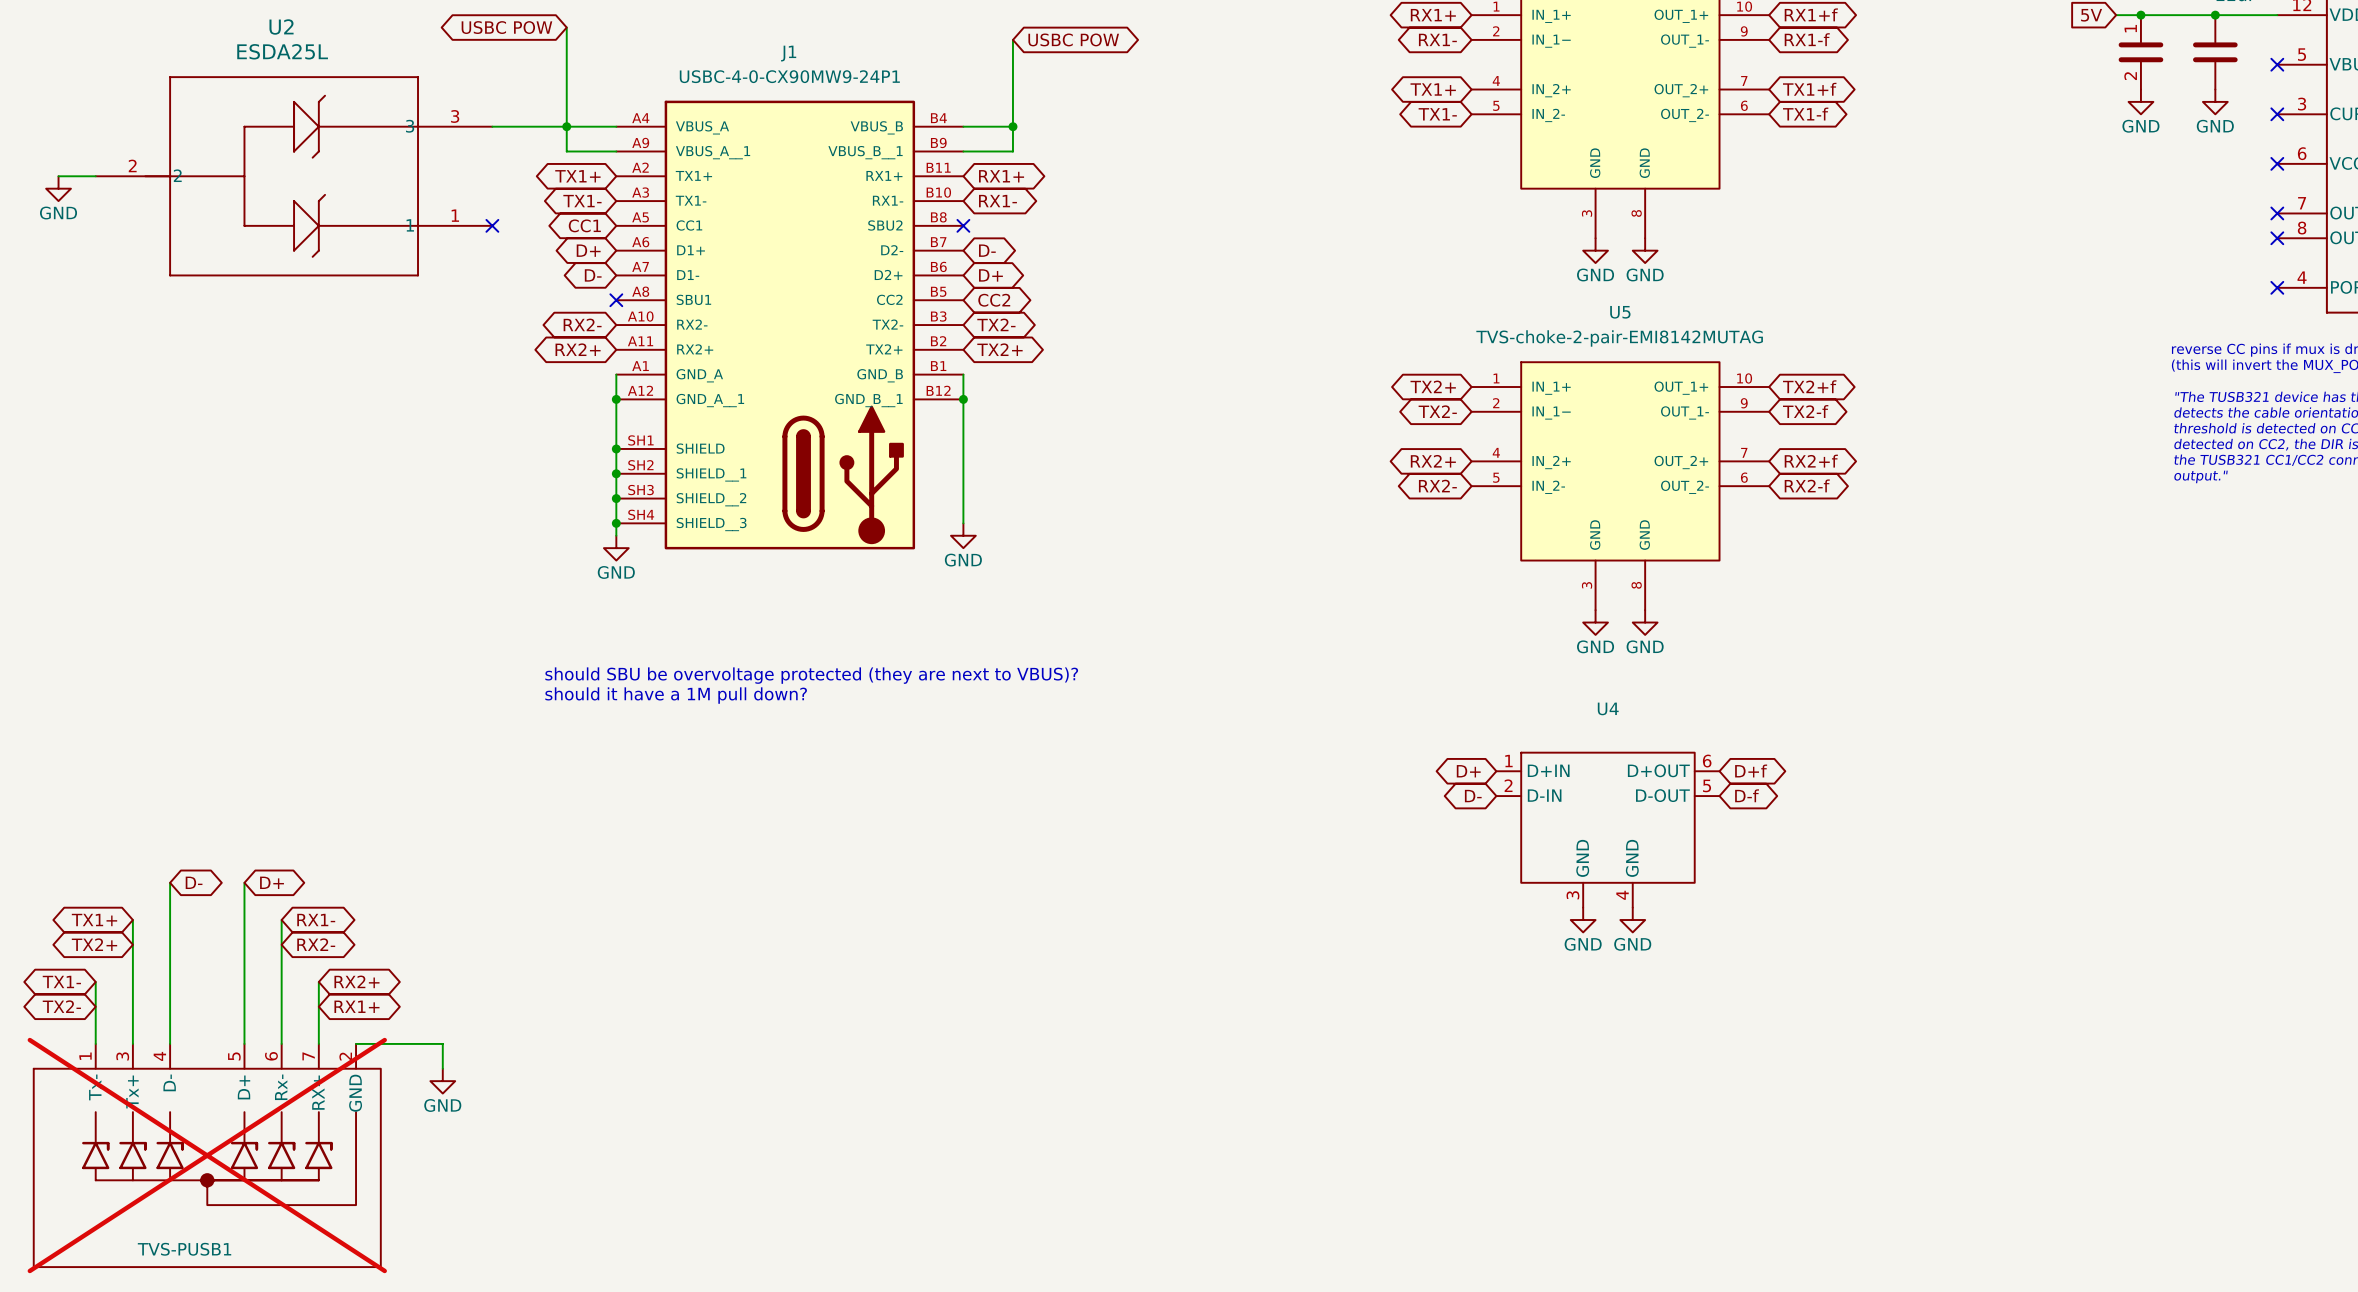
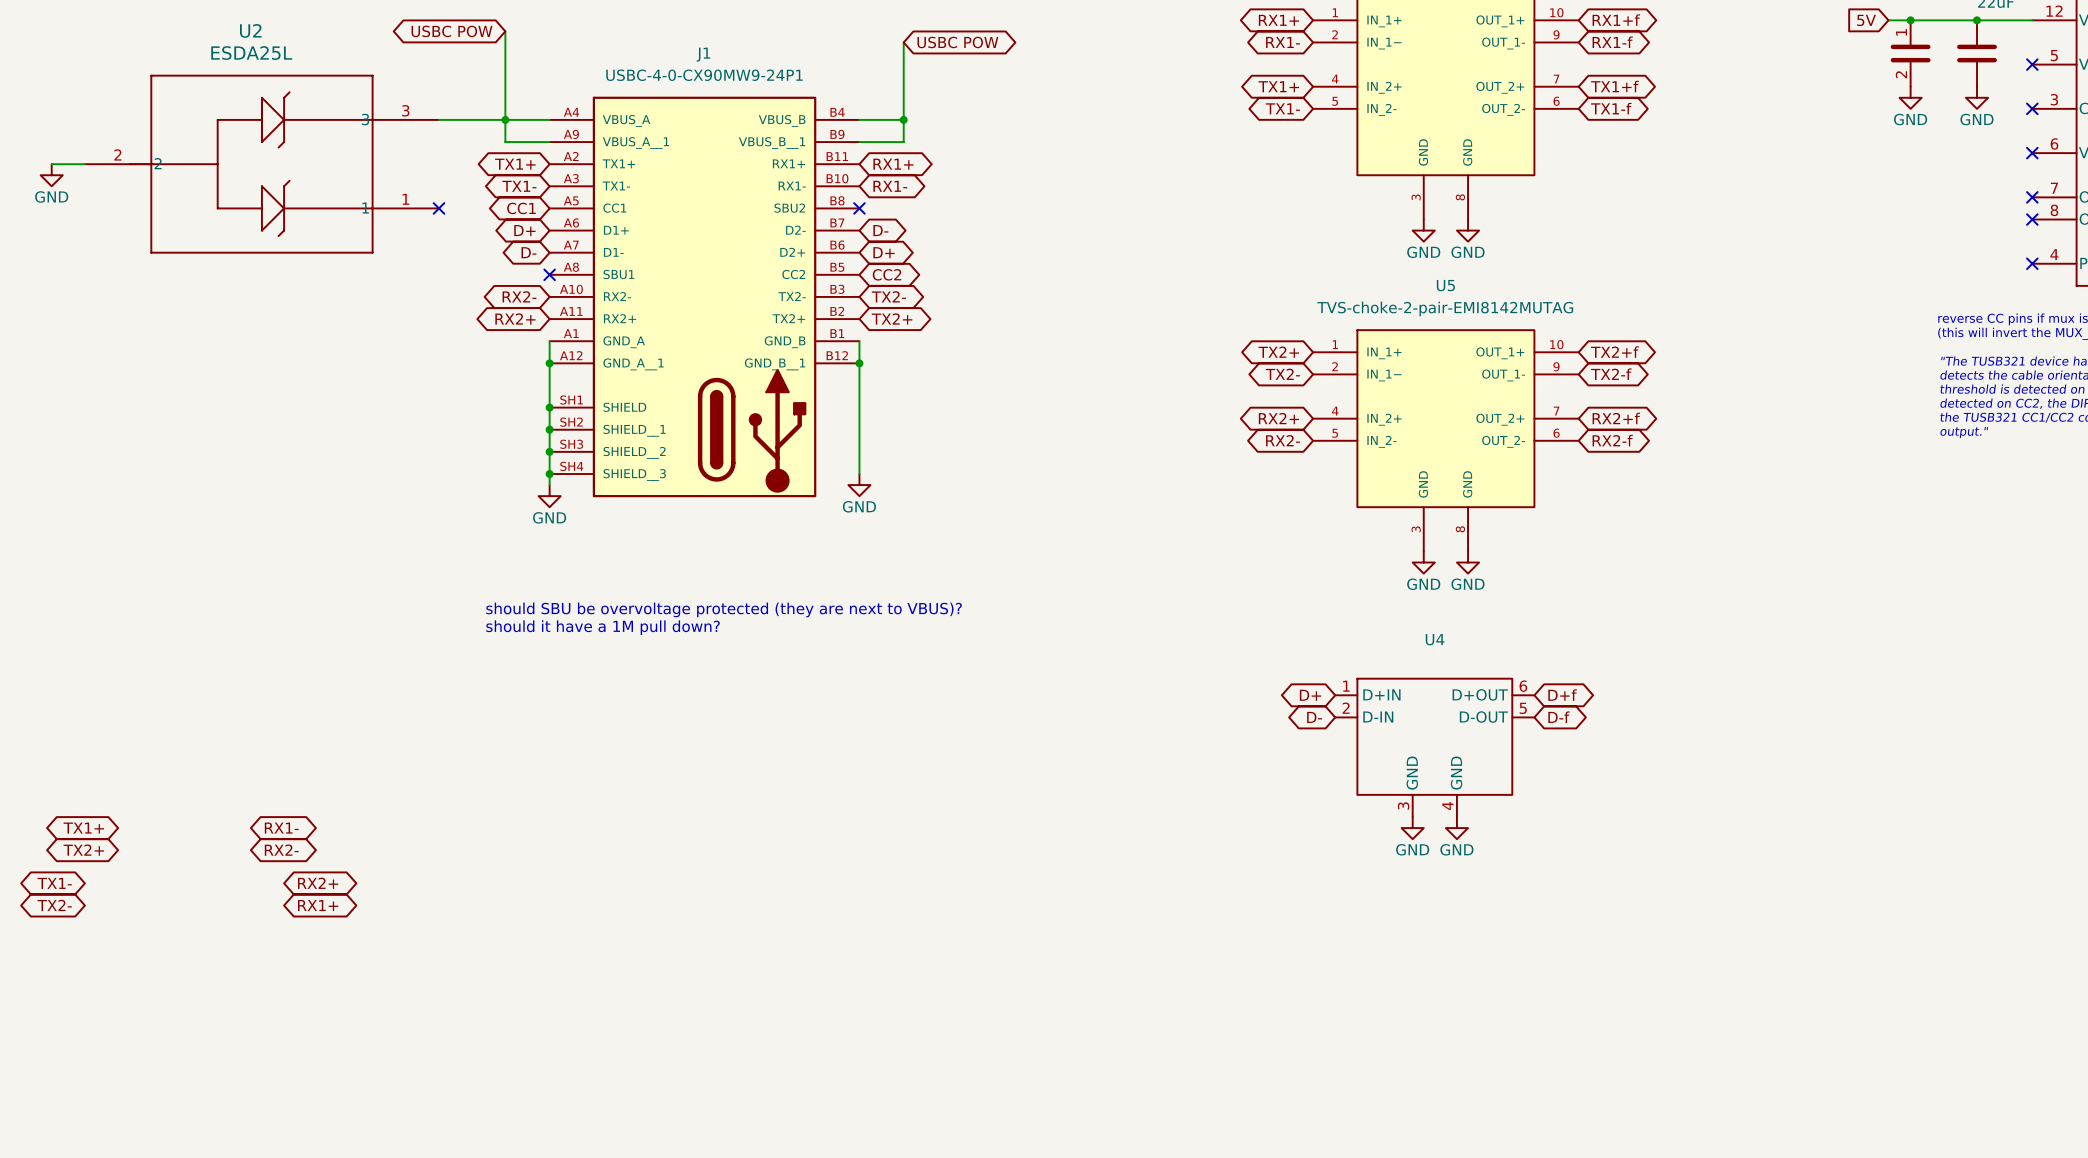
wire: (170, 882) (170, 1043) -> none
global label: D- (194, 882) -> none
wire: (244, 882) (244, 1043) -> none
global label: D+ (272, 882) -> none
wire: (132, 920) (132, 1043) -> none
wire: (281, 920) (281, 1043) -> none
wire: (95, 981) (95, 1043) -> none
wire: (318, 981) (318, 1043) -> none
wire: (356, 1043) (442, 1043) (442, 1068) -> none
power symbol: GND (442, 1081) -> none
TVS-PUSB1: (207, 1155) -> none

